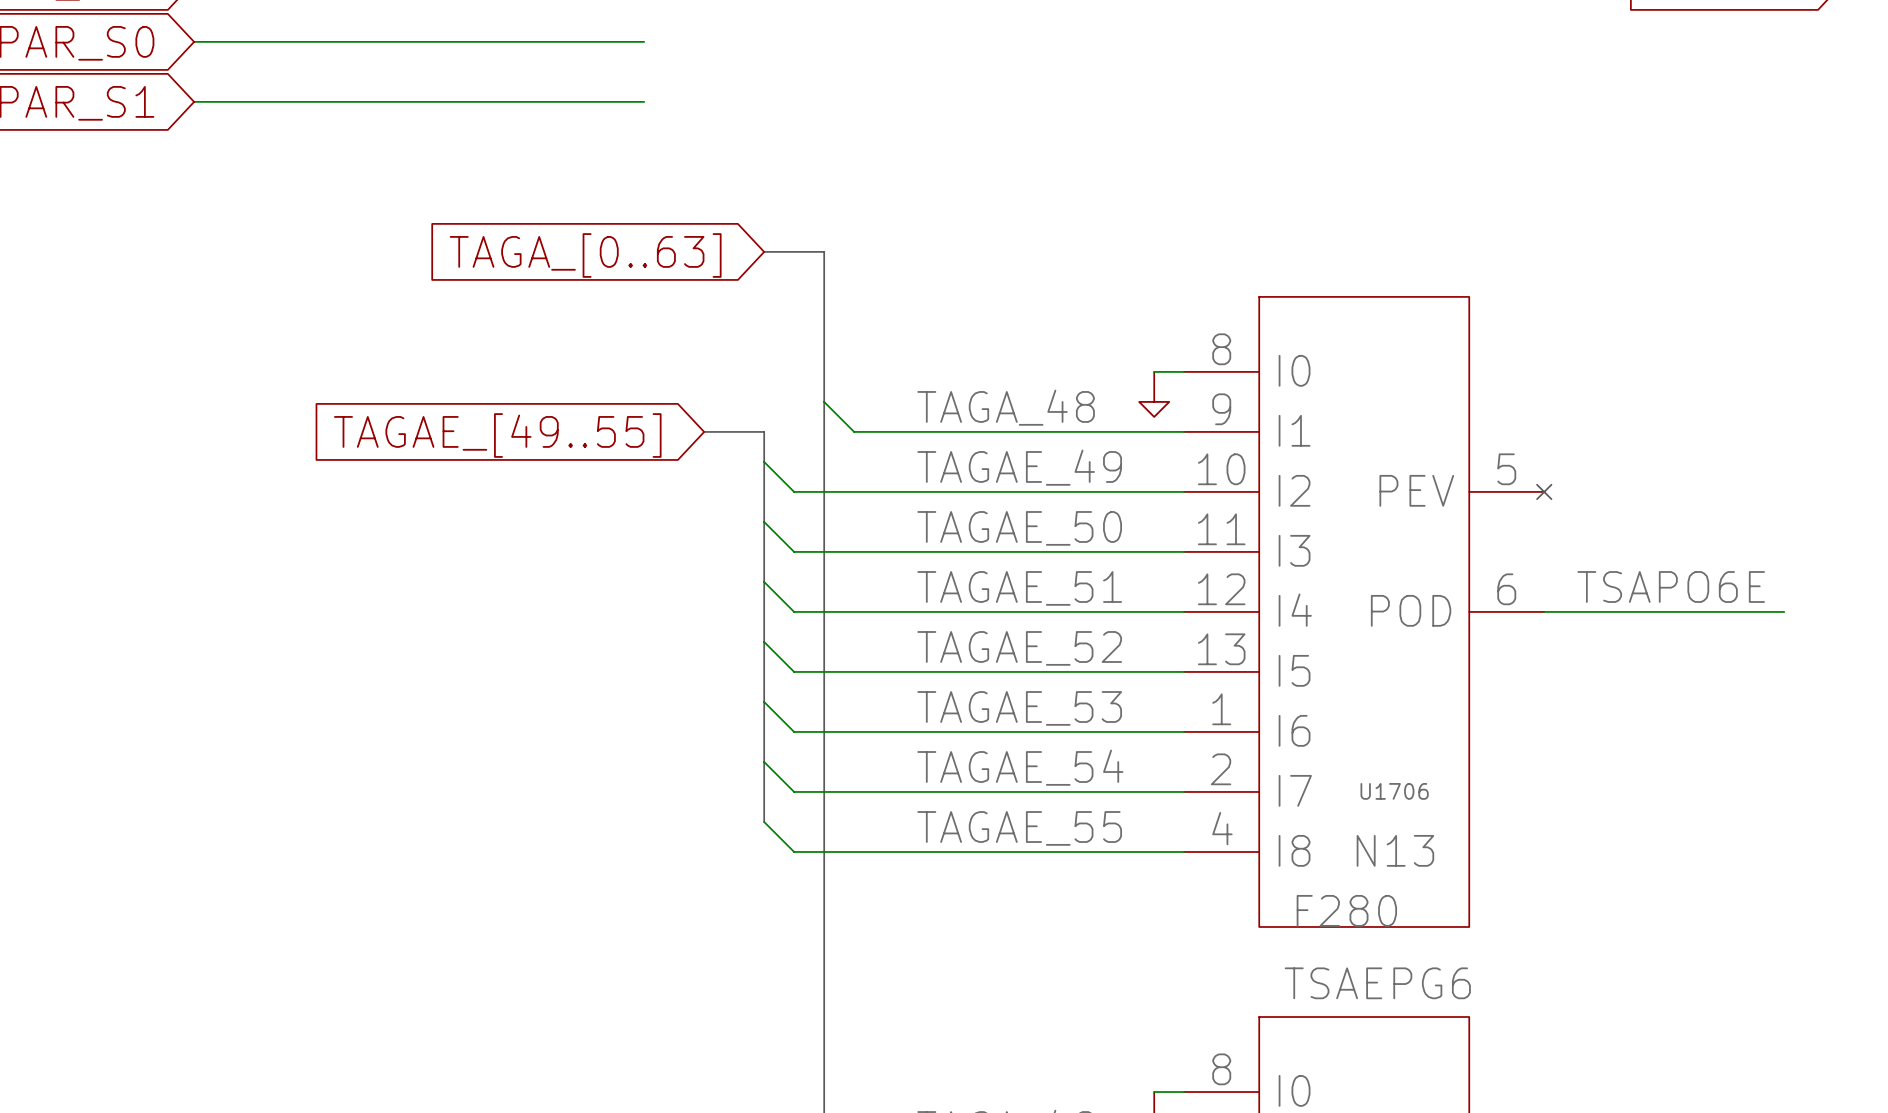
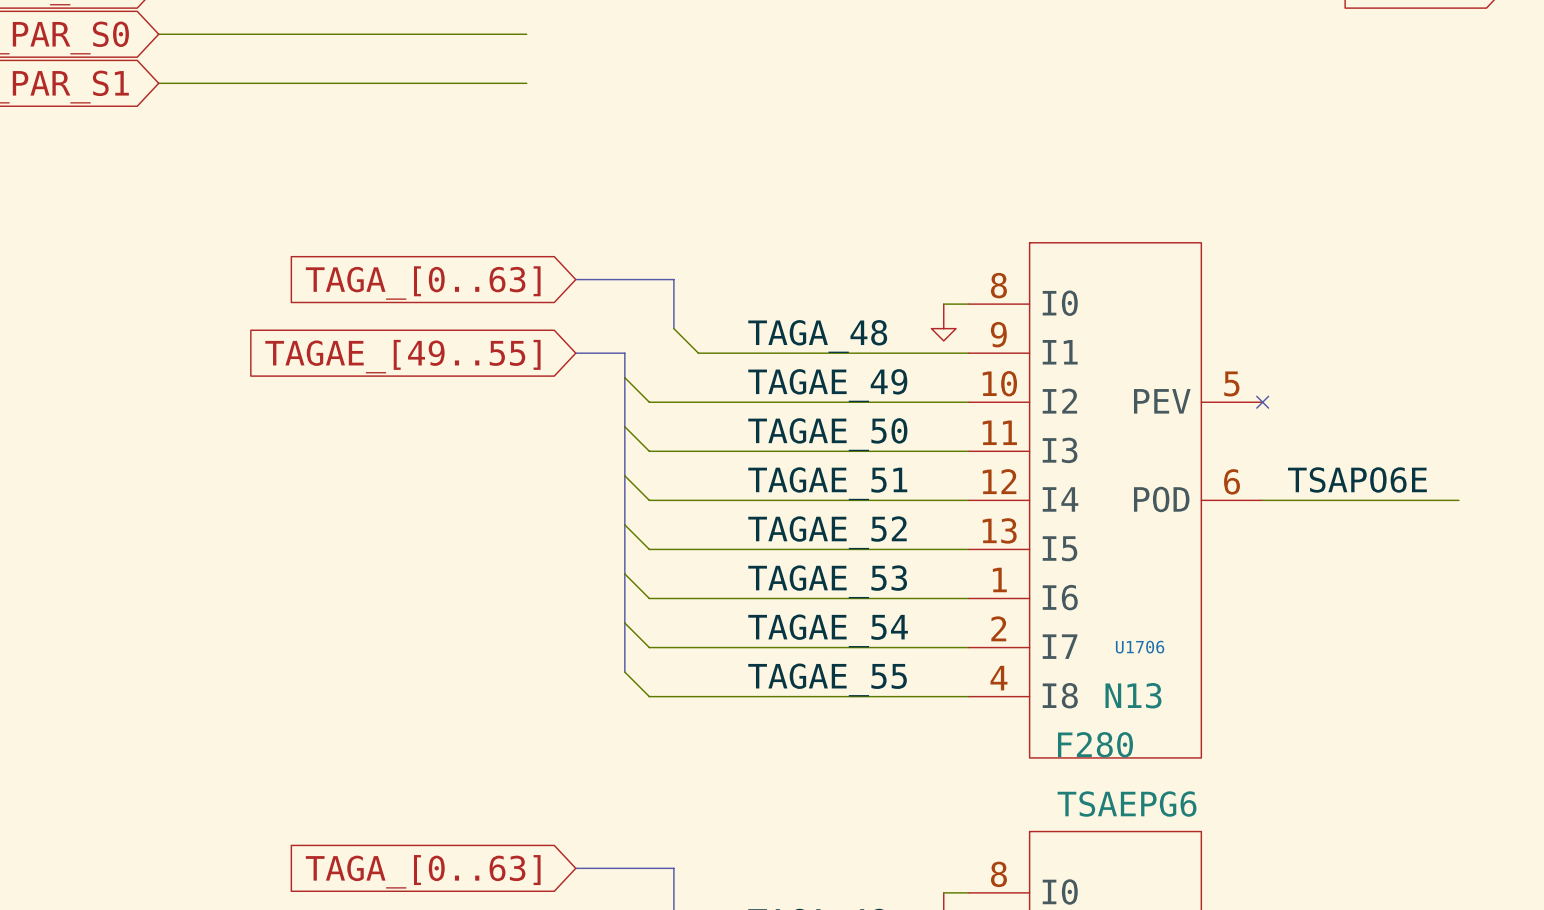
bus: (764, 251) (824, 251) (824, 341) -> (575, 279) (673, 279)
global label position: TAGA_[0..63] (585, 255) -> TAGA_[0..63] (423, 283)
bus: (824, 401) (824, 1062) -> (575, 868) (673, 868)
global label: none -> TAGA_[0..63] (423, 871)

